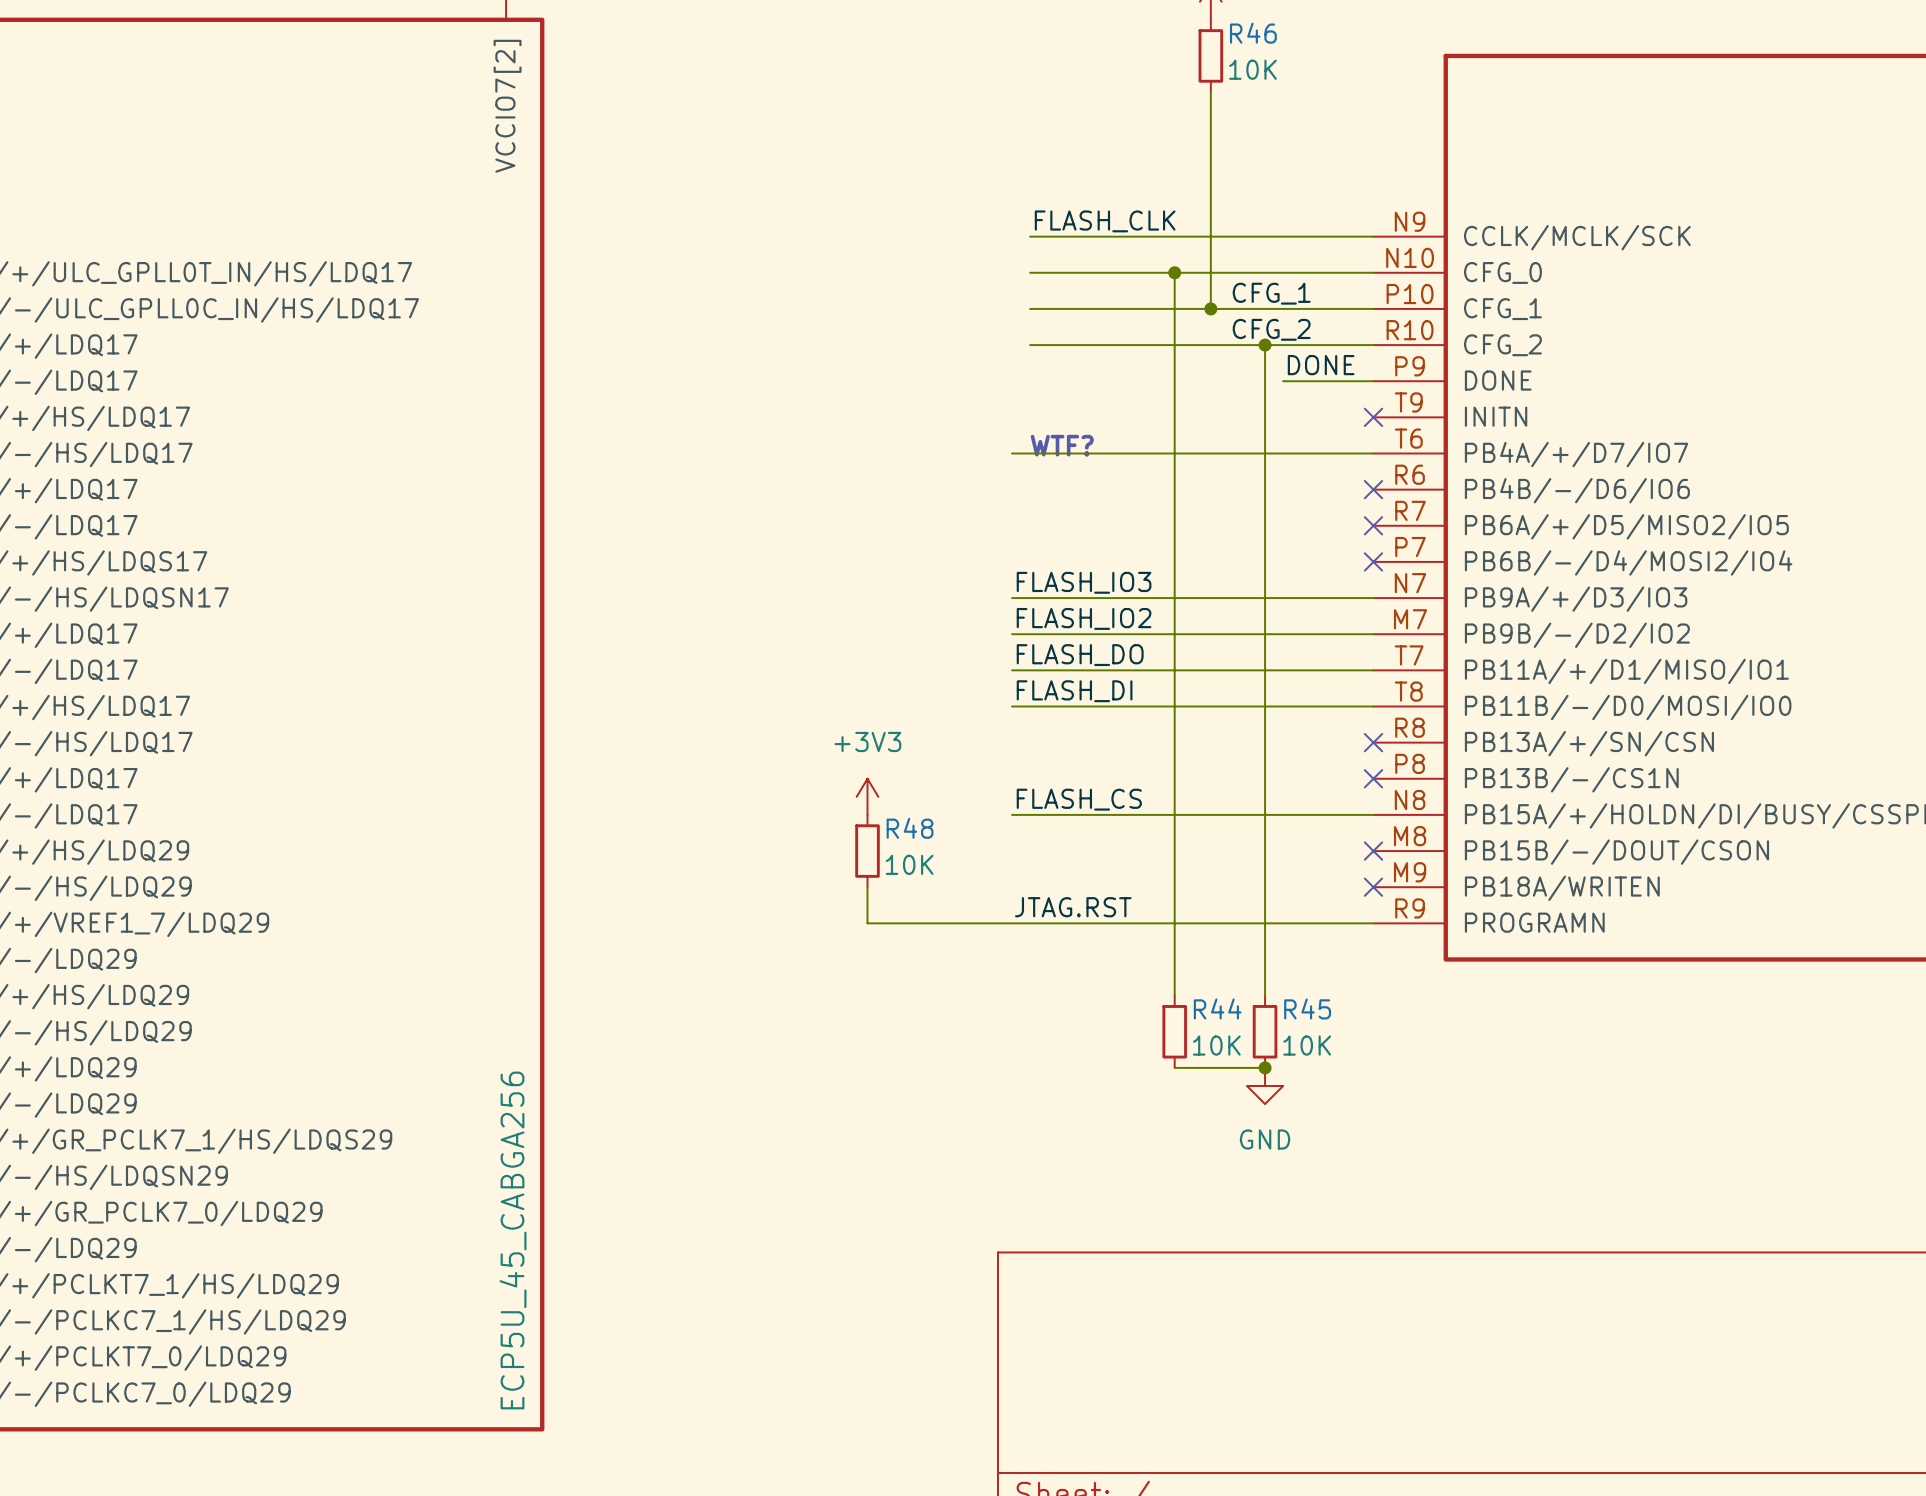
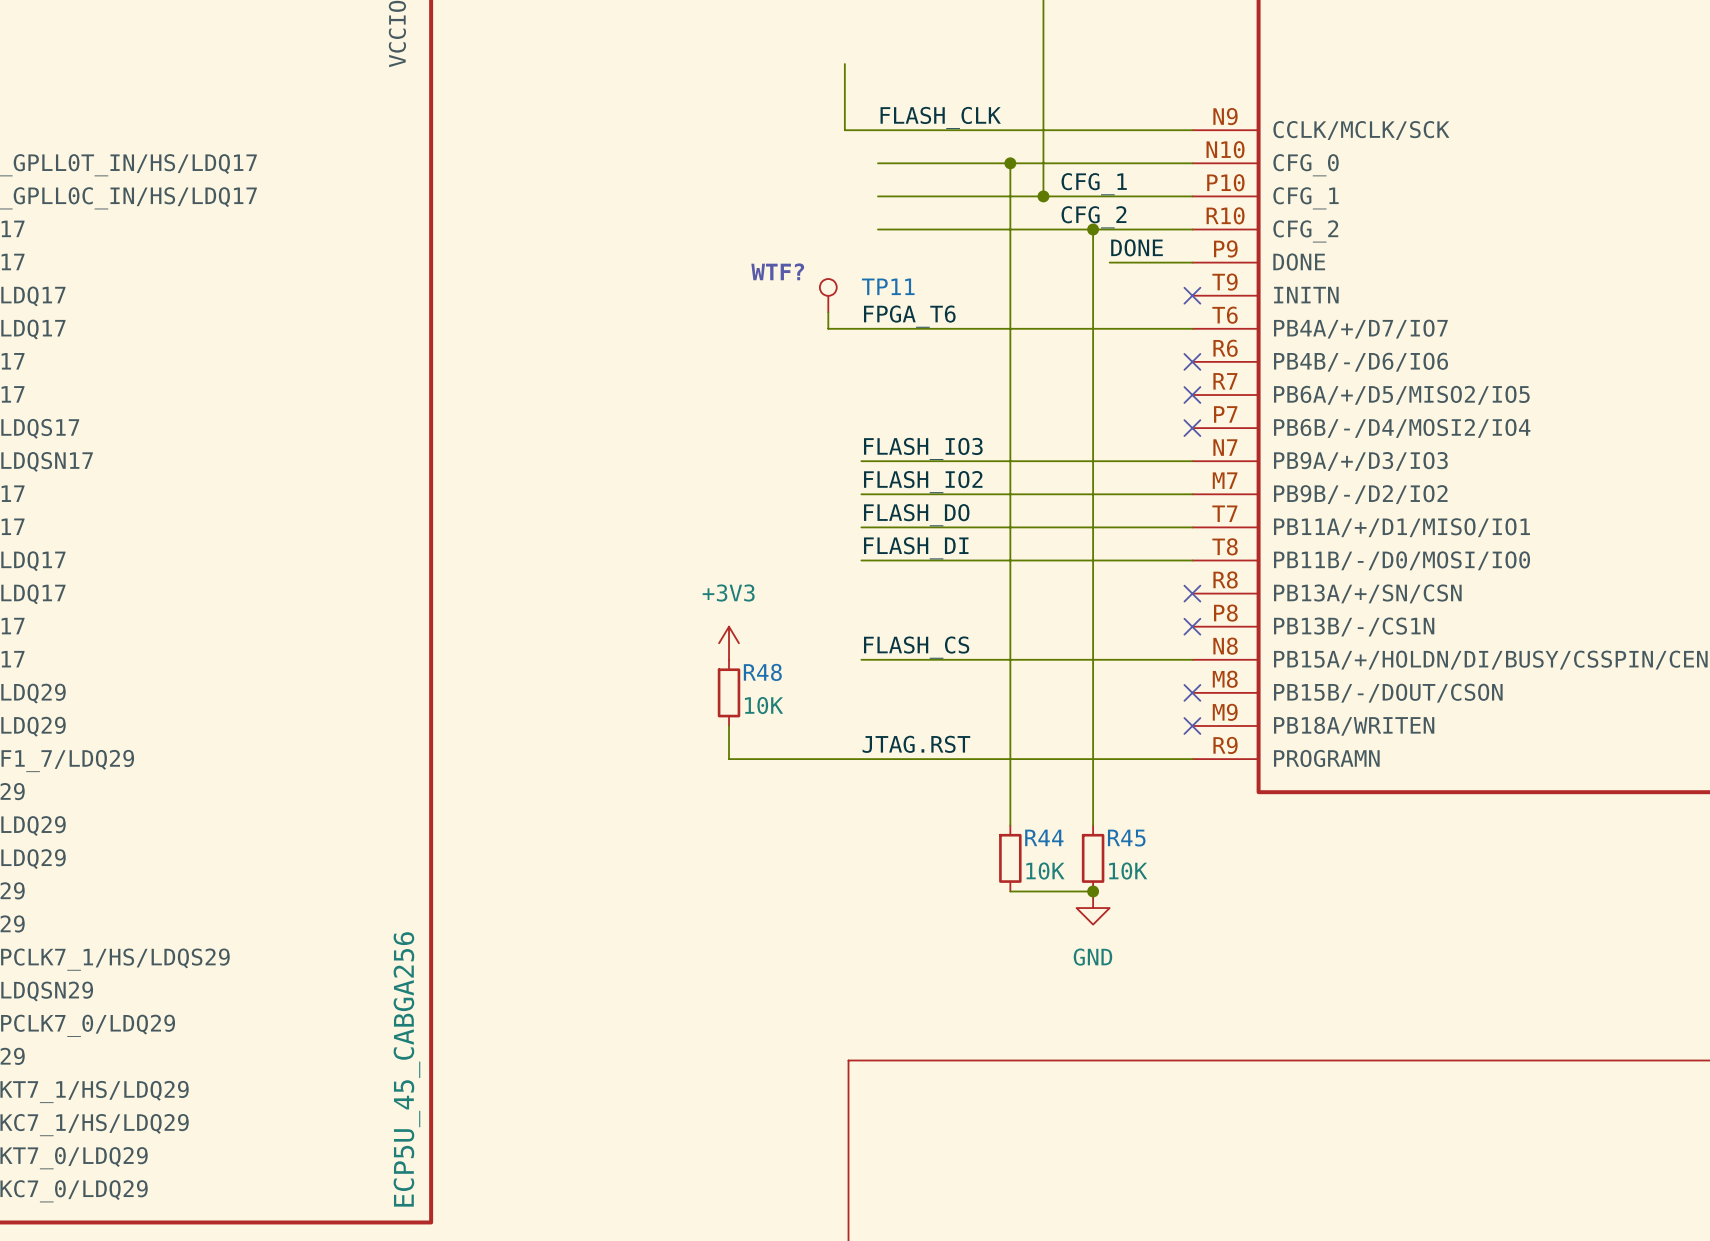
wire: none -> (844, 64) (844, 130) (877, 130)
TP11: none -> (828, 295)
wire: none -> (828, 312) (828, 328) (861, 328)
label: none -> FPGA_T6 (909, 316)
text position: WTF? (1062, 445) -> WTF? (777, 271)

